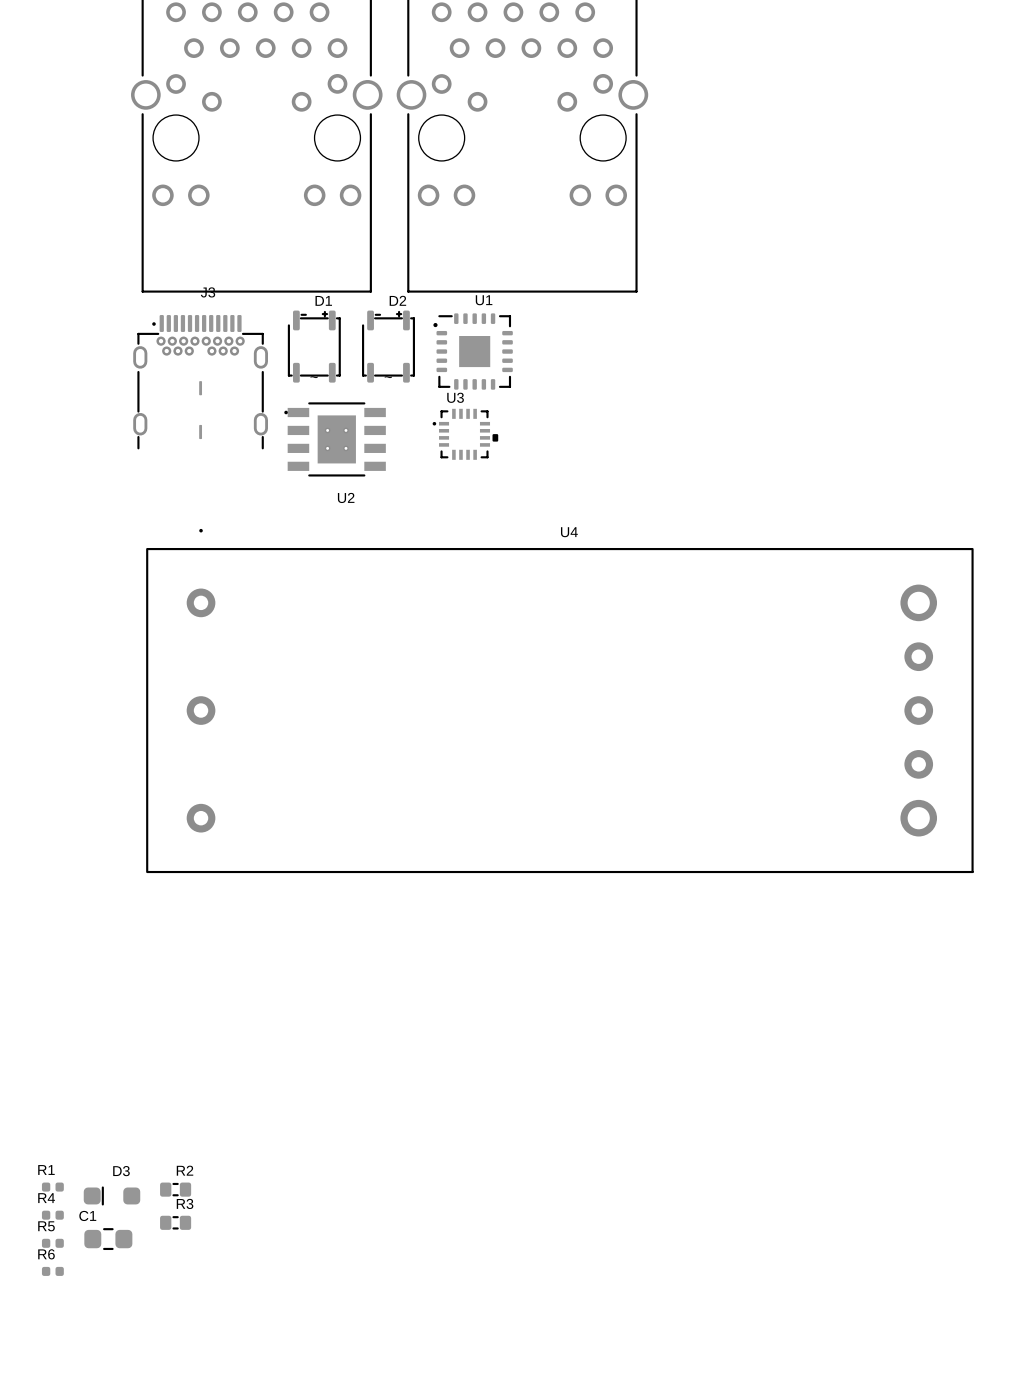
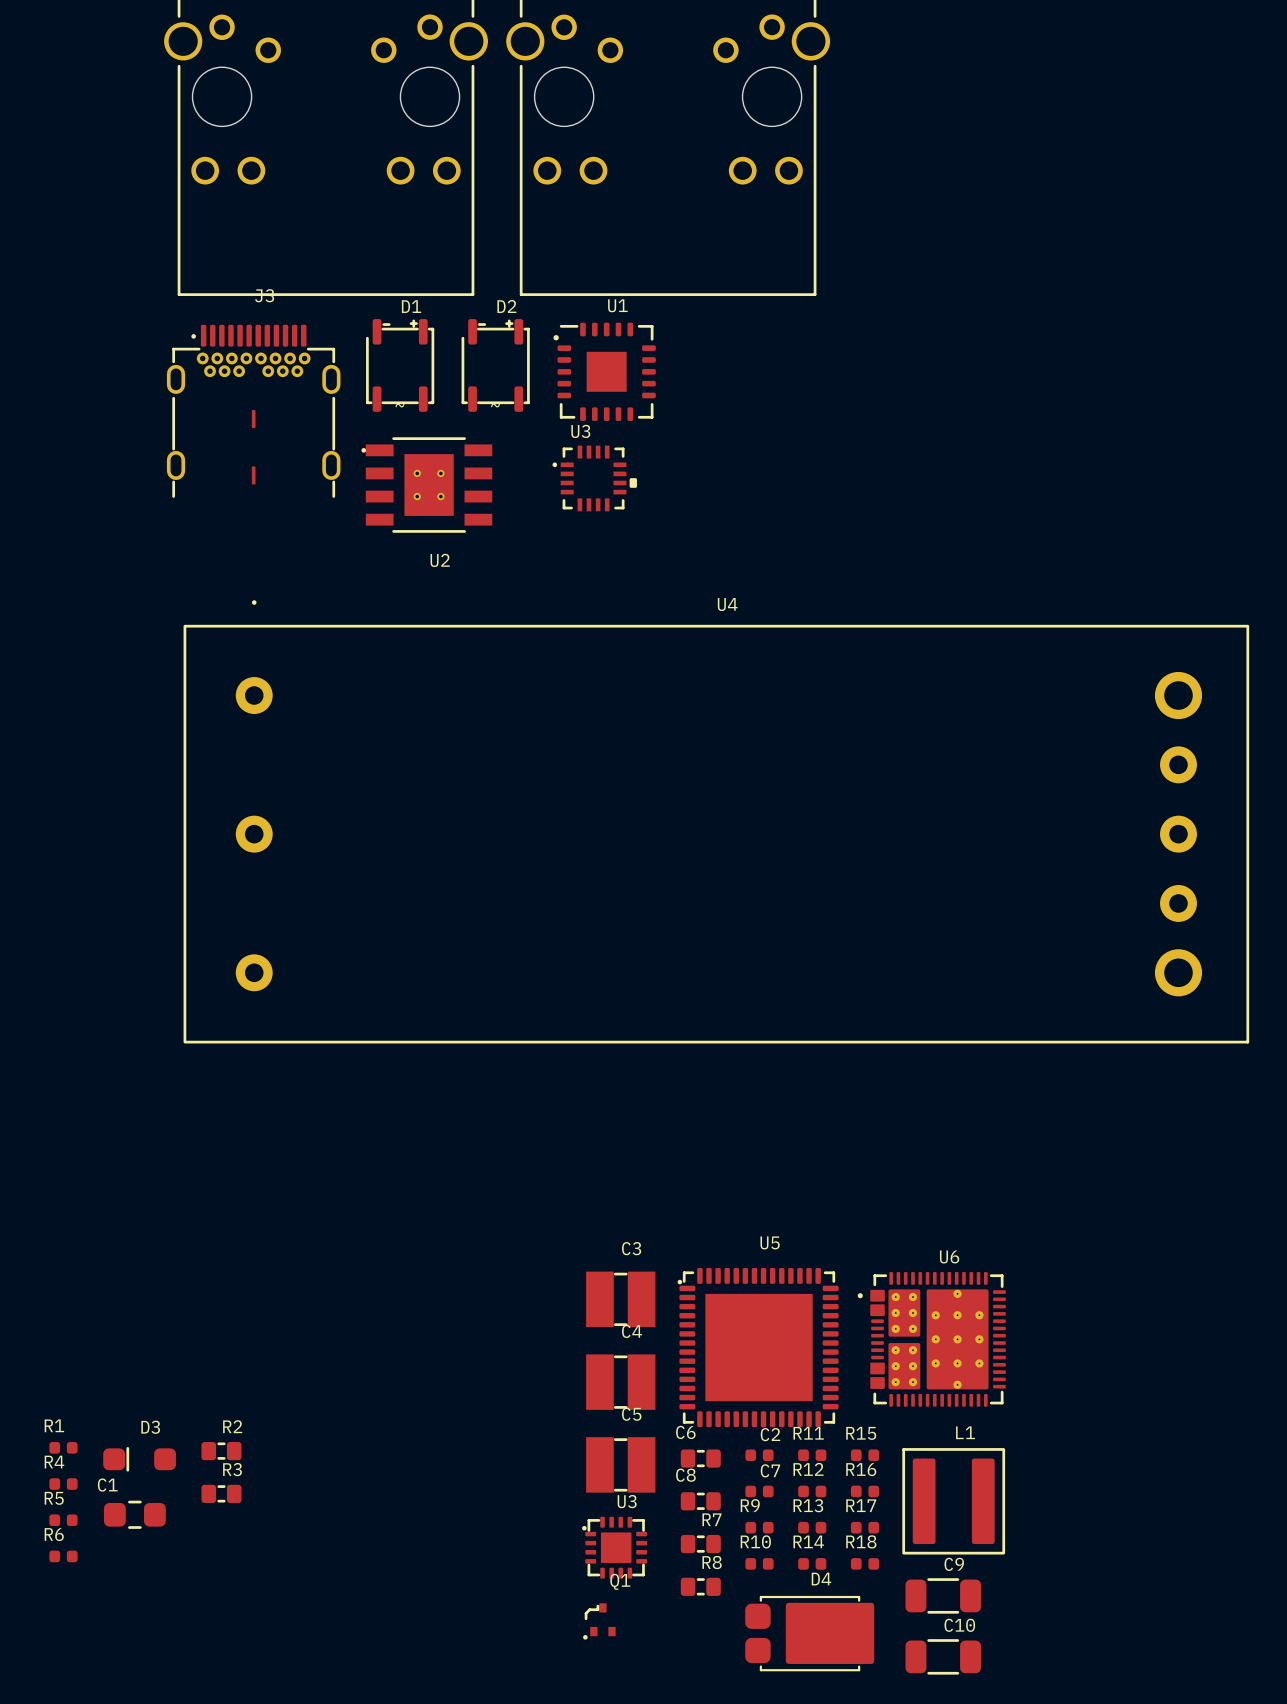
C3: none -> (620, 1299)
U6: none -> (931, 1339)
U5: none -> (758, 1347)
C4: none -> (620, 1382)
C2: none -> (759, 1455)
R11: none -> (812, 1455)
R15: none -> (865, 1455)
C6: none -> (700, 1458)
C5: none -> (620, 1464)
C7: none -> (759, 1491)
R12: none -> (812, 1491)
R16: none -> (865, 1491)
C8: none -> (700, 1501)
L1: none -> (953, 1501)
R9: none -> (759, 1527)
R13: none -> (812, 1527)
R17: none -> (865, 1527)
R7: none -> (700, 1544)
U3: none -> (614, 1547)
R10: none -> (759, 1563)
R14: none -> (812, 1563)
R18: none -> (865, 1563)
R8: none -> (700, 1586)
C9: none -> (943, 1595)
Q1: none -> (599, 1621)
D4: none -> (809, 1633)
C10: none -> (943, 1656)

